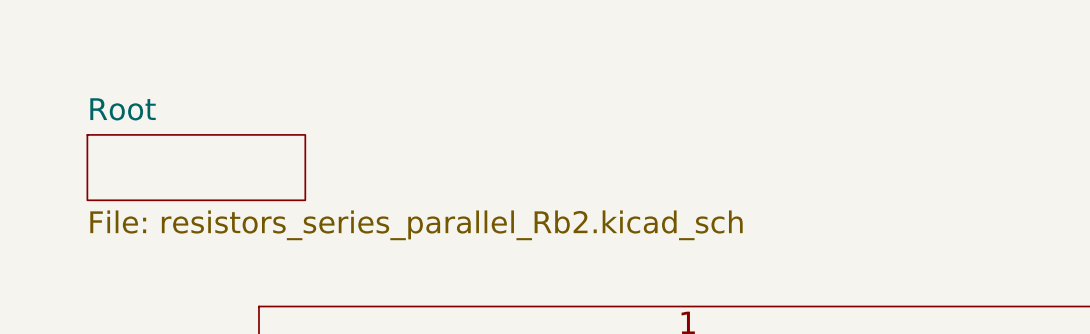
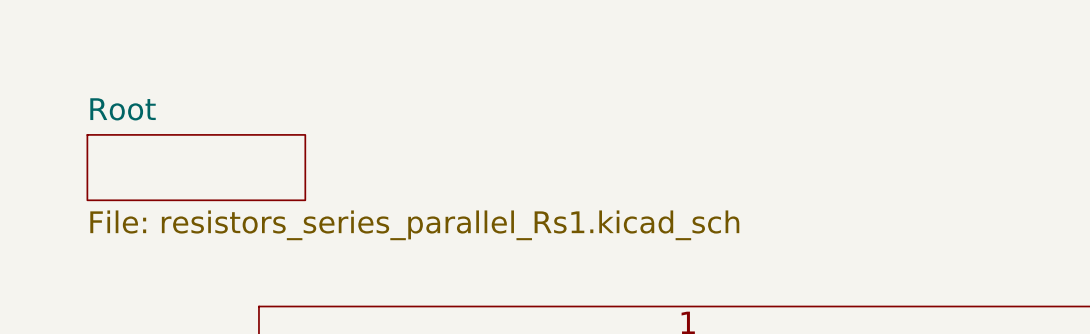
sheet Root value: File: resistors_series_parallel_Rb2.kicad_sch (416, 225) -> File: resistors_series_parallel_Rs1.kicad_sch (414, 225)

